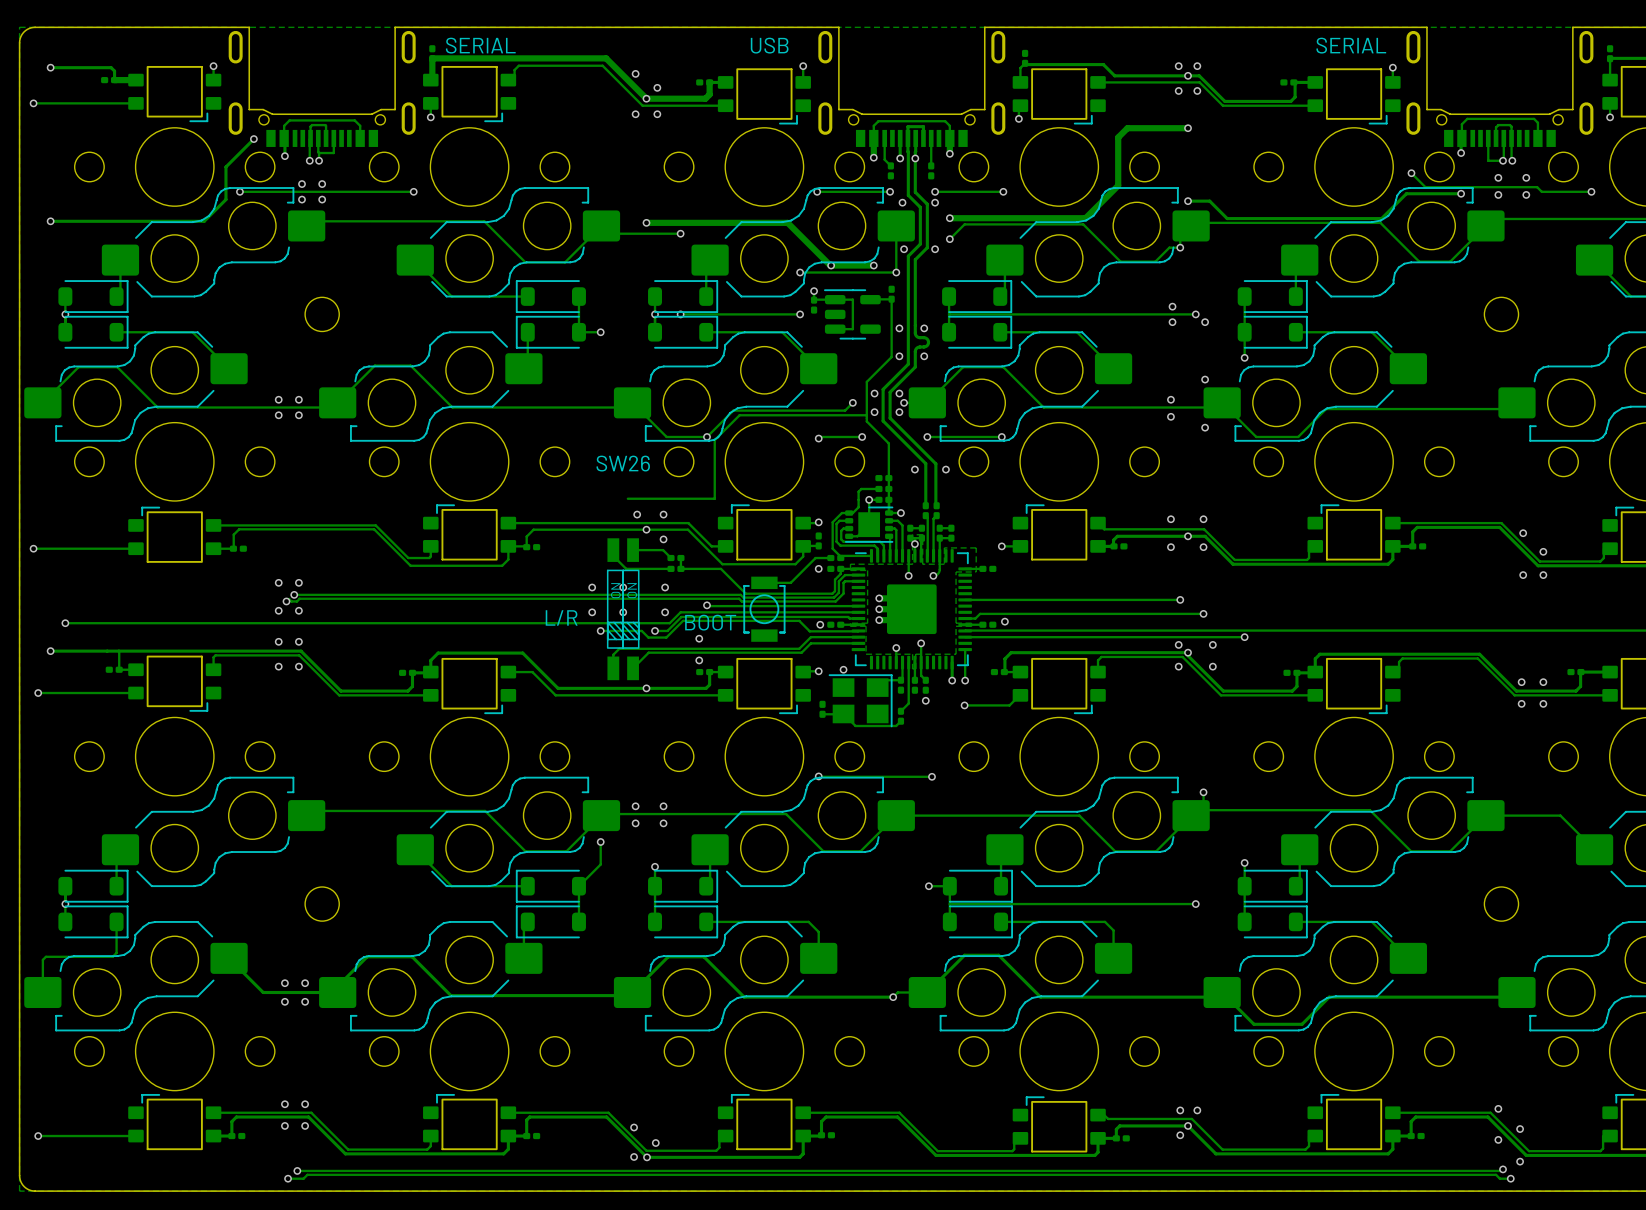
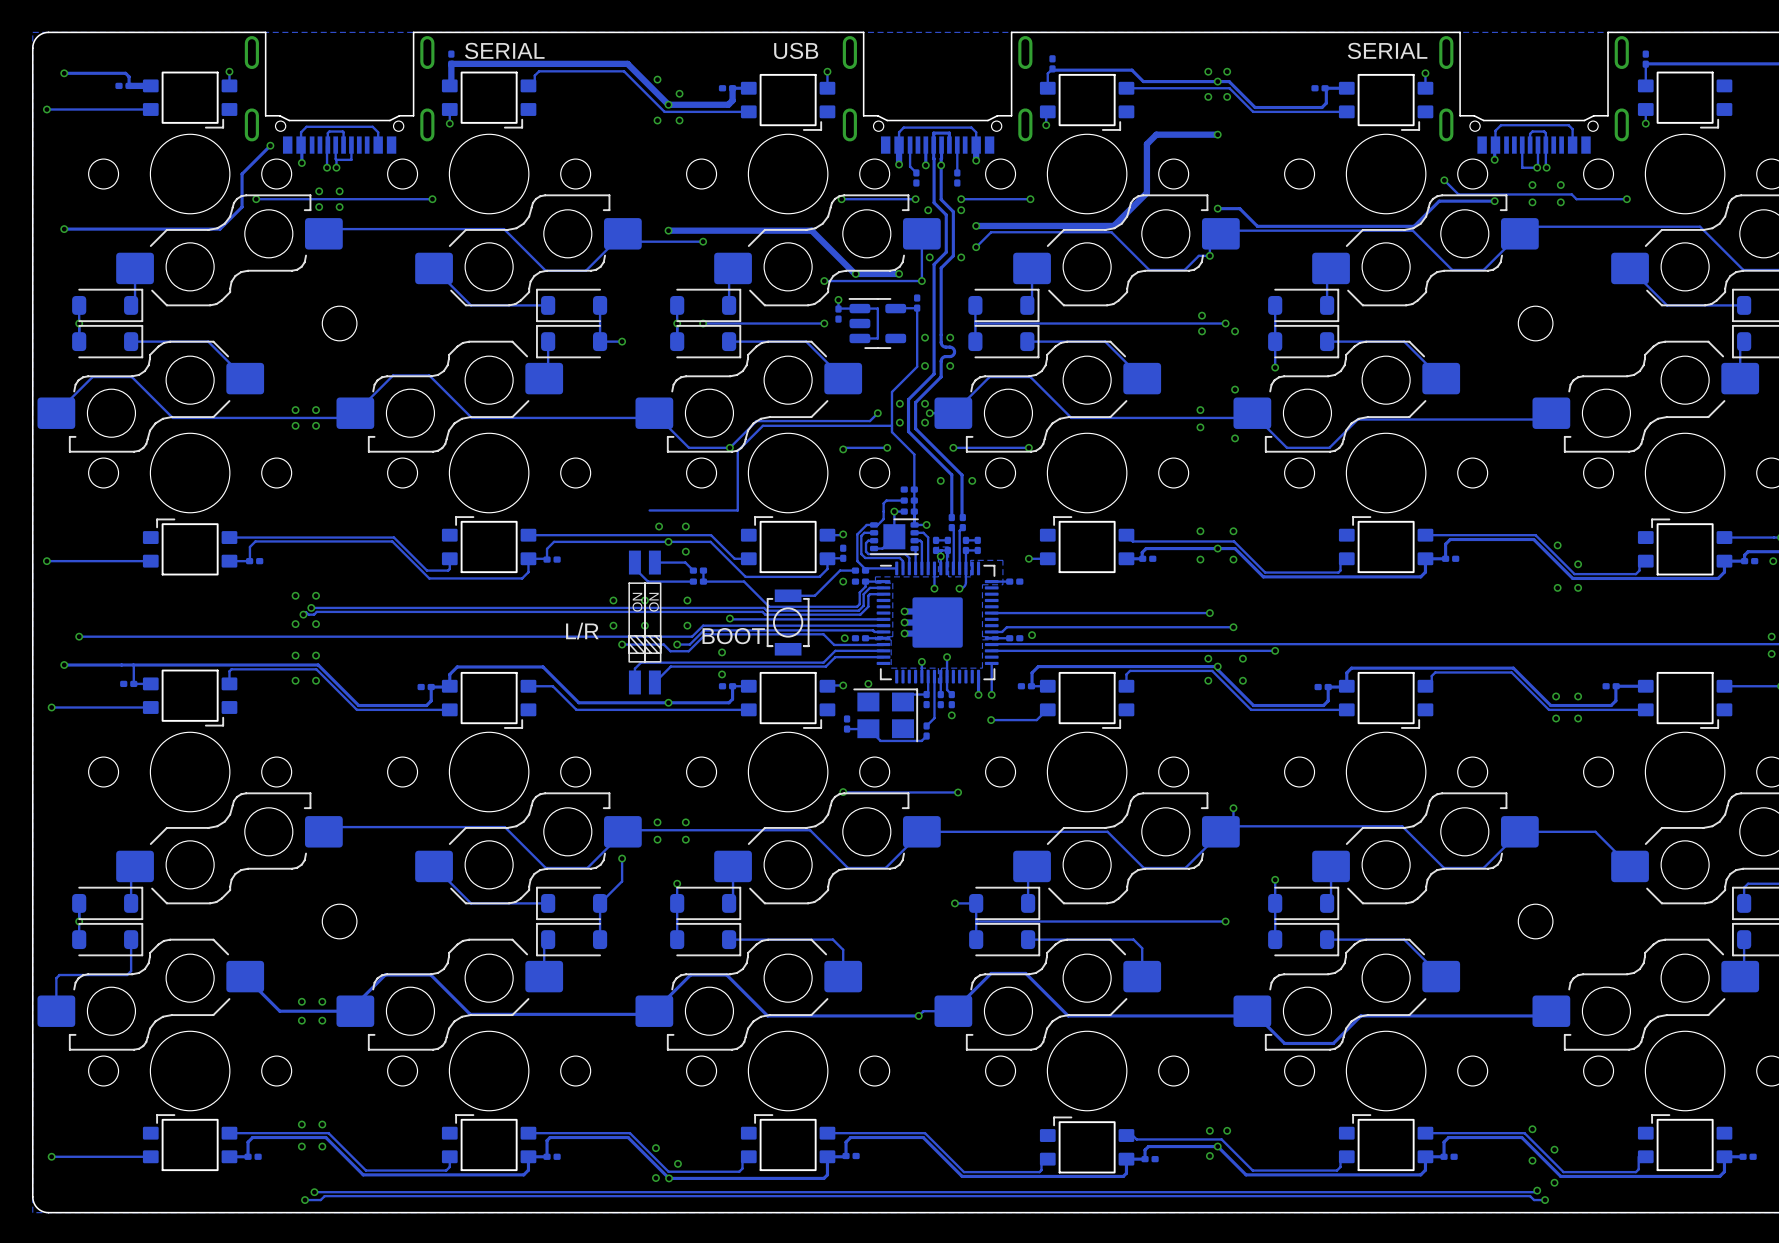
SW26 name: SW26 (623, 463) -> none

